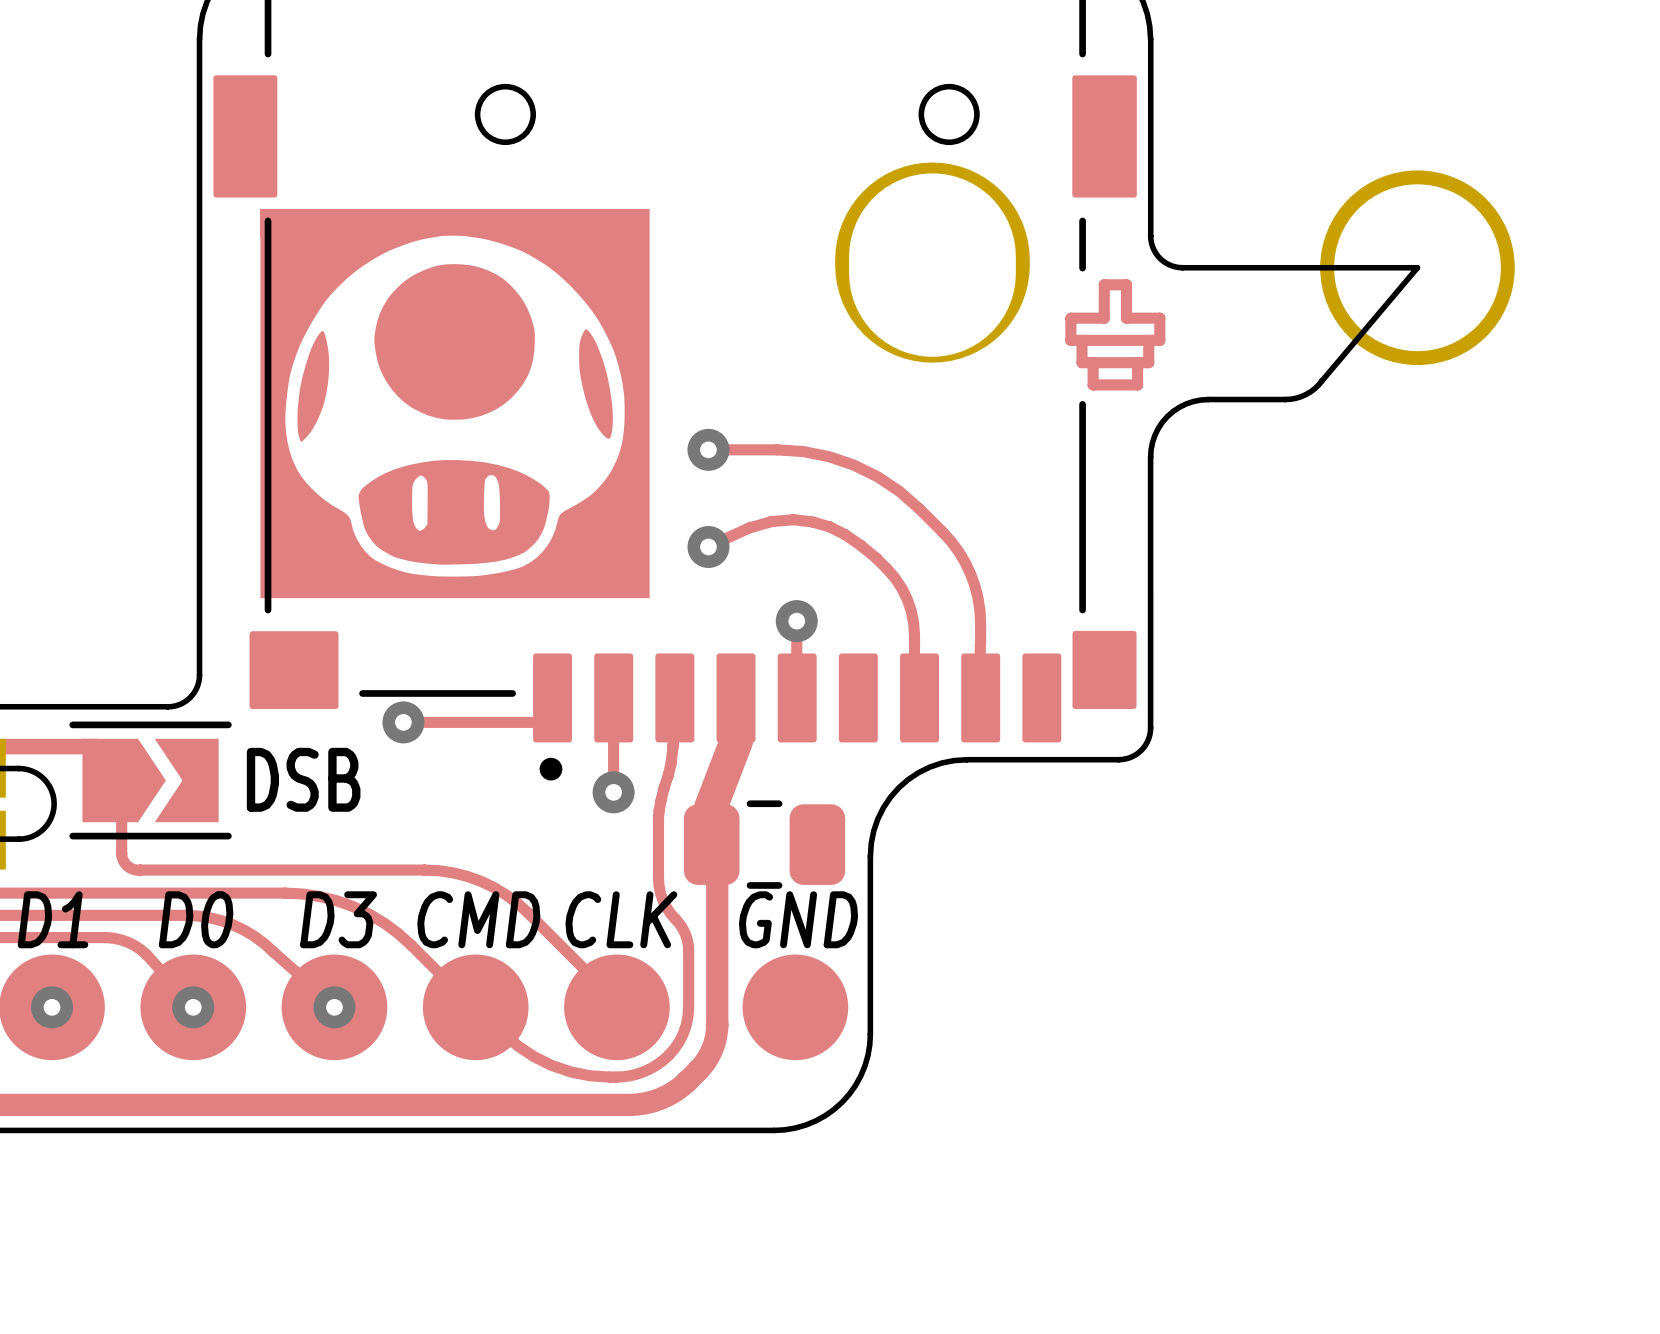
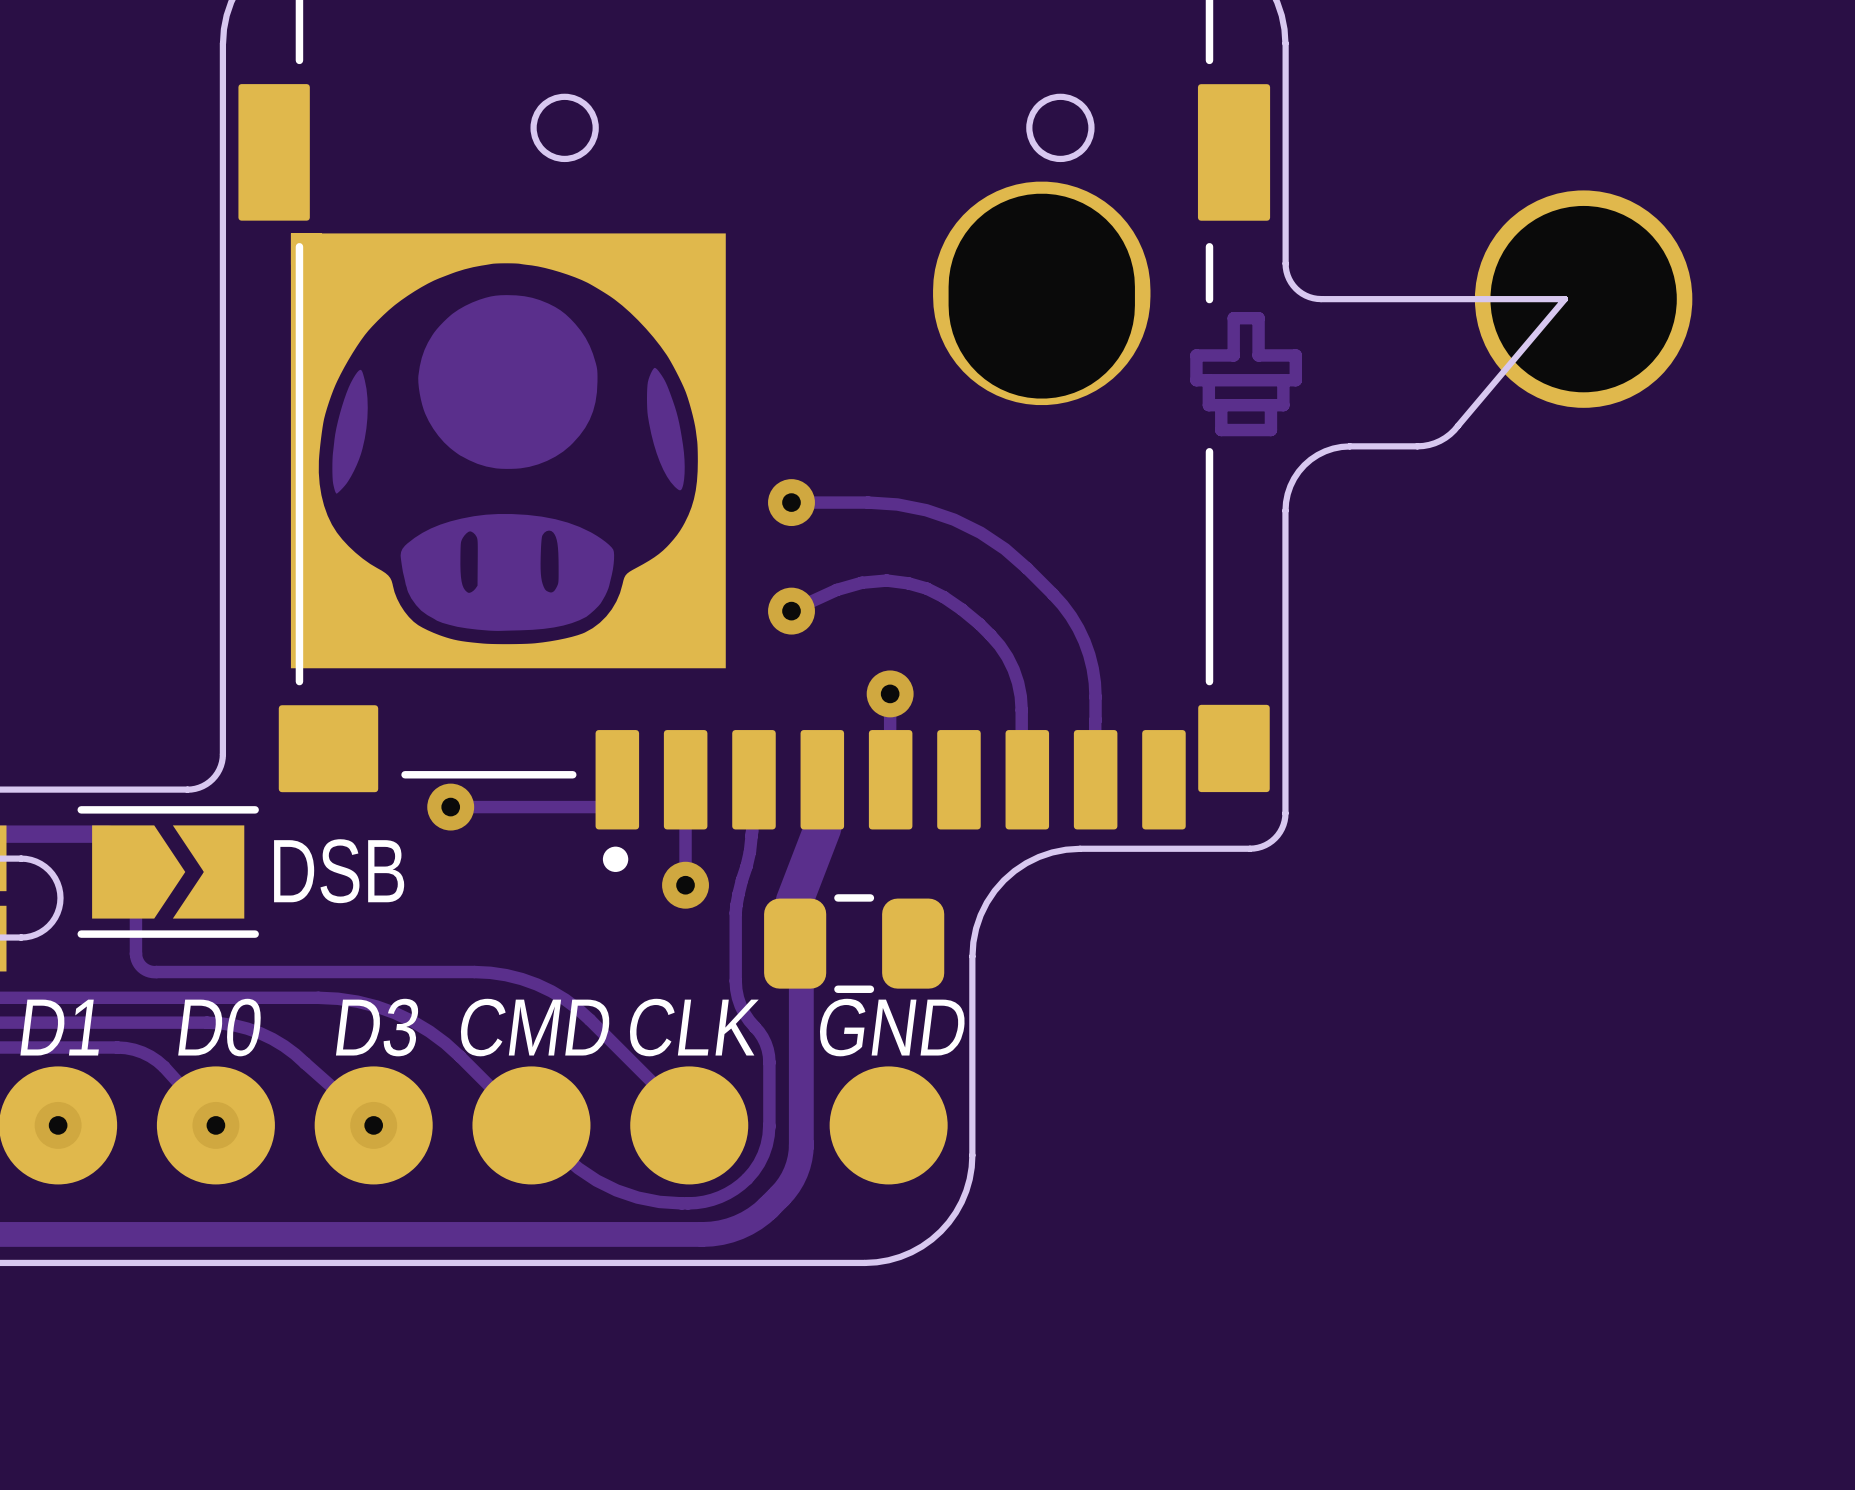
board edge: (1400, 267) (1417, 267) (1318, 385) (1310, 391) (1295, 398) (1268, 399) -> (1564, 299) (1454, 430) (1434, 443) (1417, 446)

